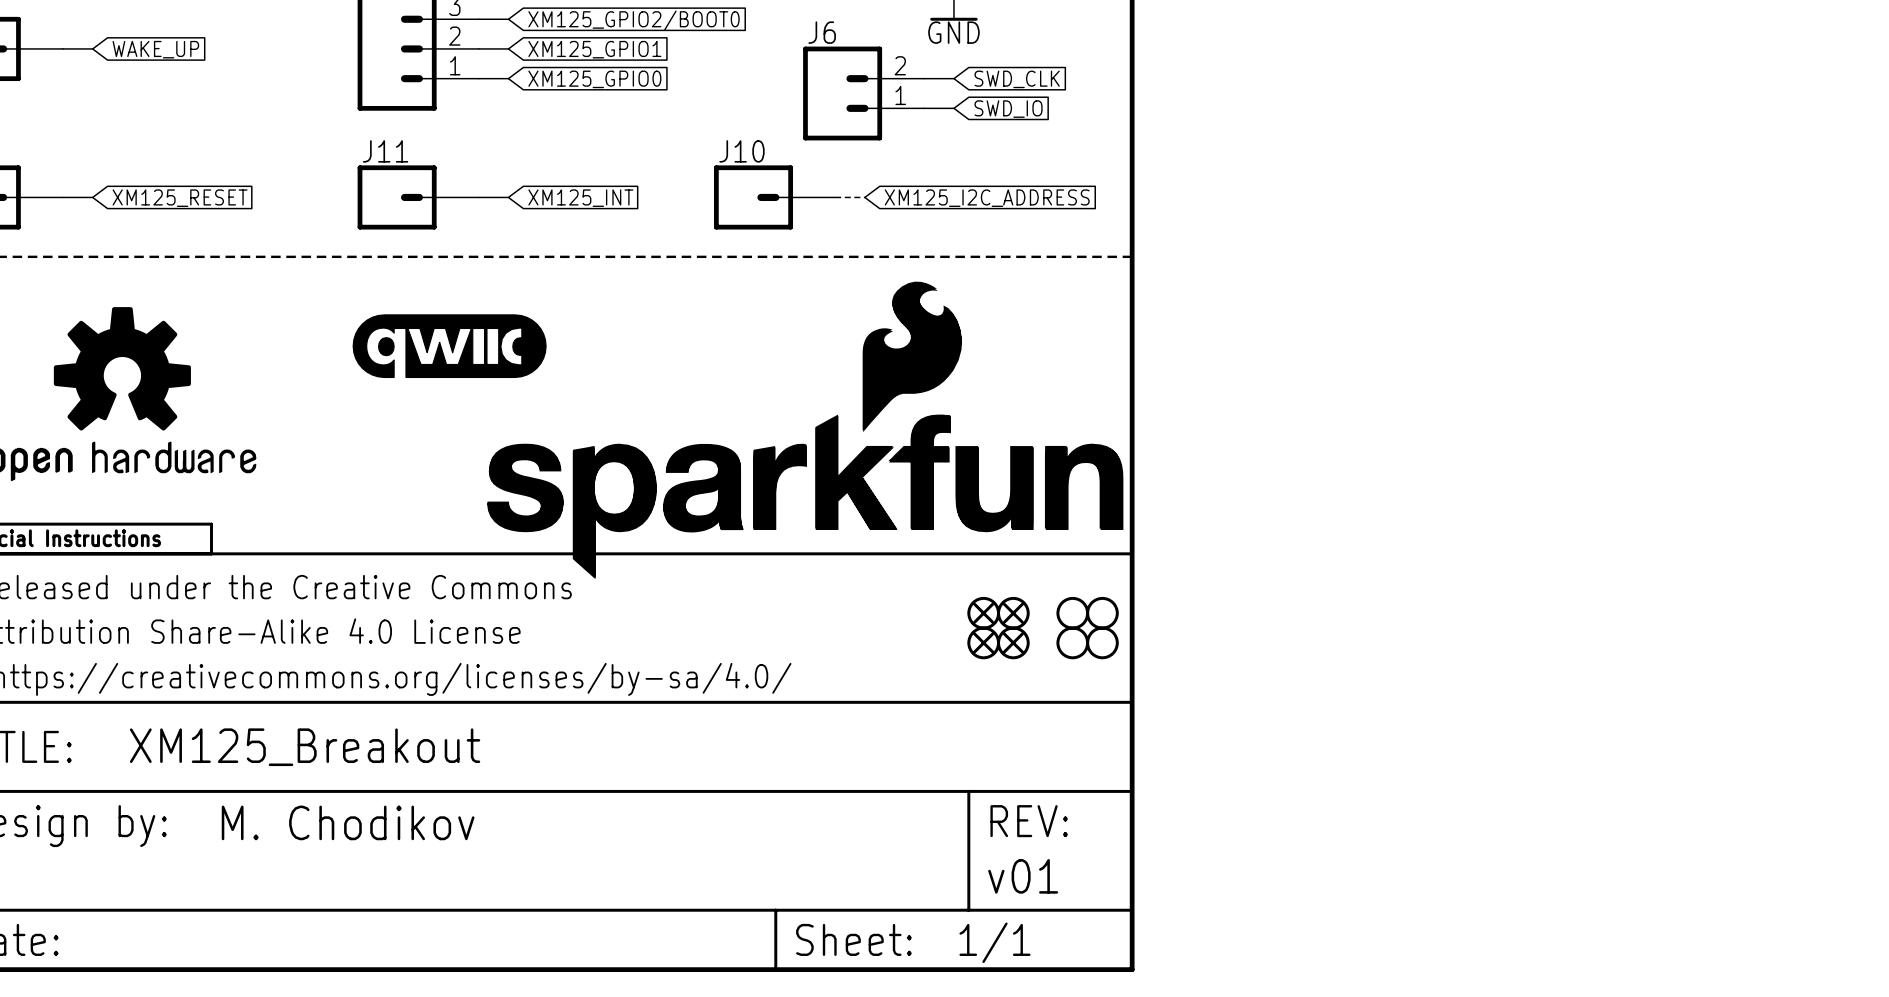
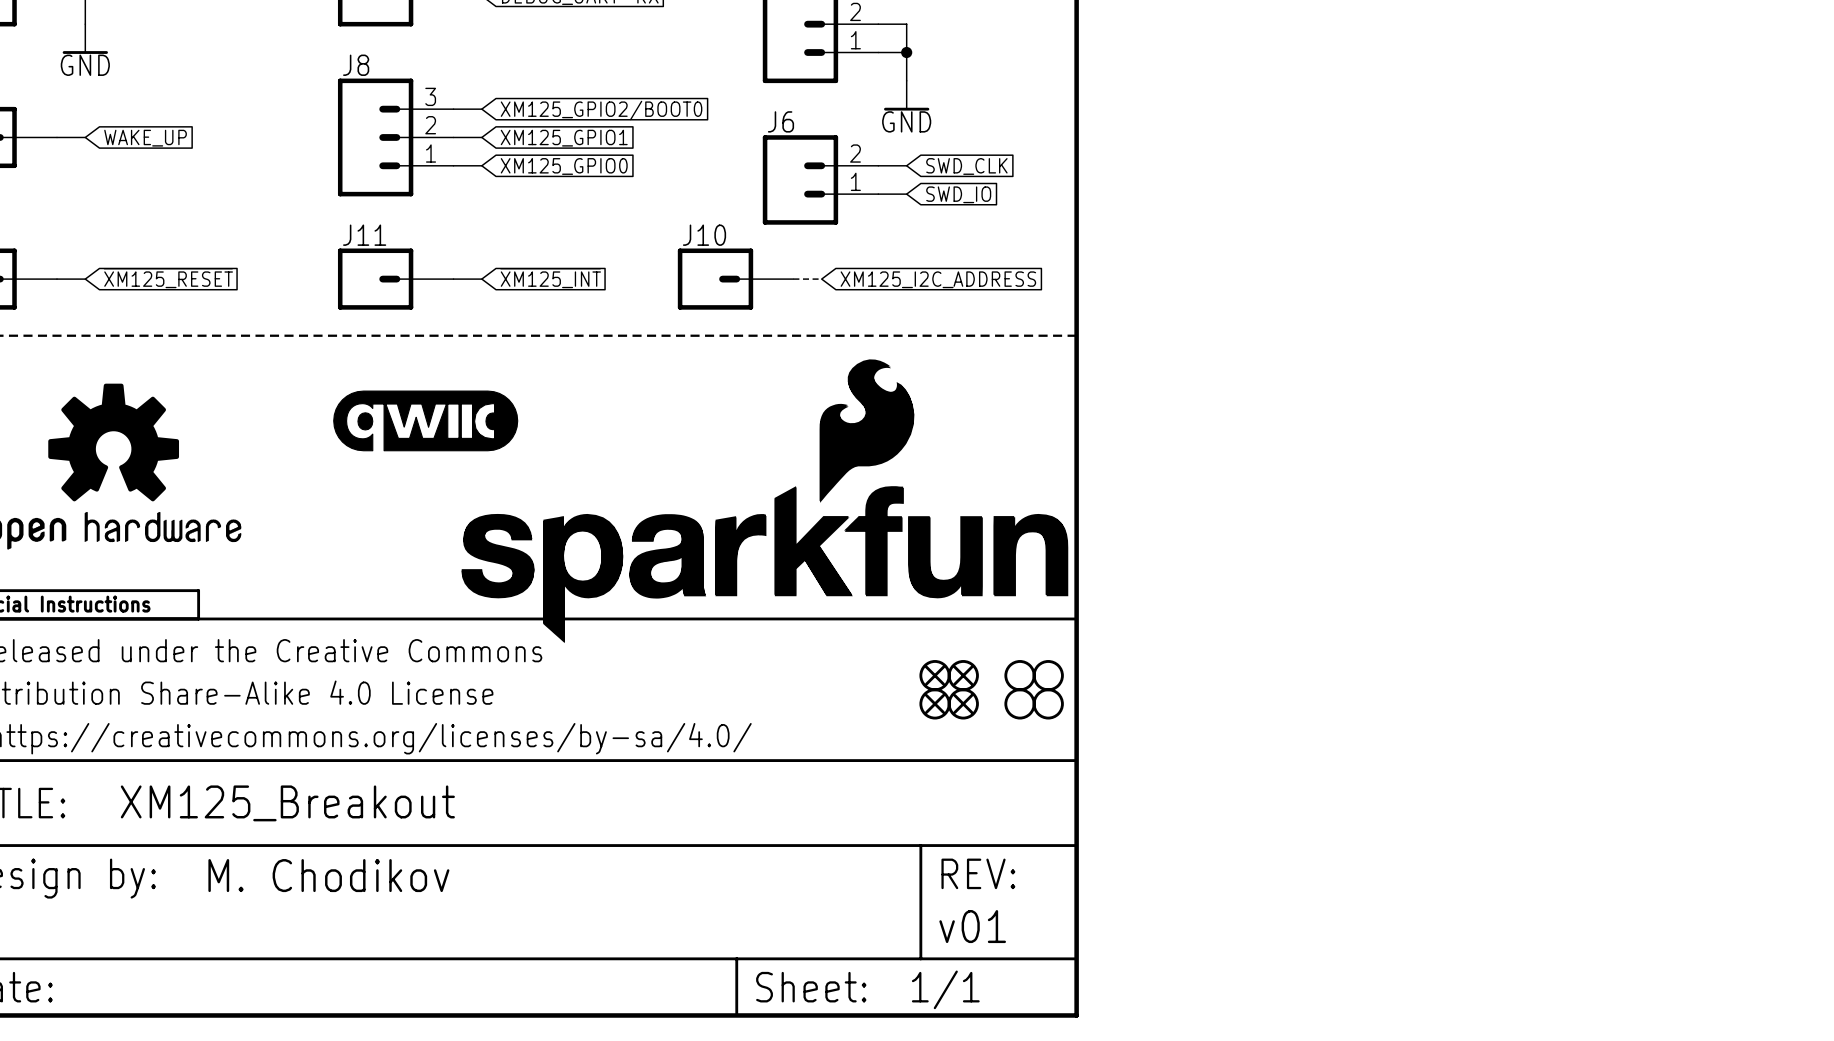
global label: XM125_RESET (180, 198) -> ~{XM125_RESET} (168, 278)
global label: XM125_INT (580, 198) -> ~{XM125_INT} (550, 278)

